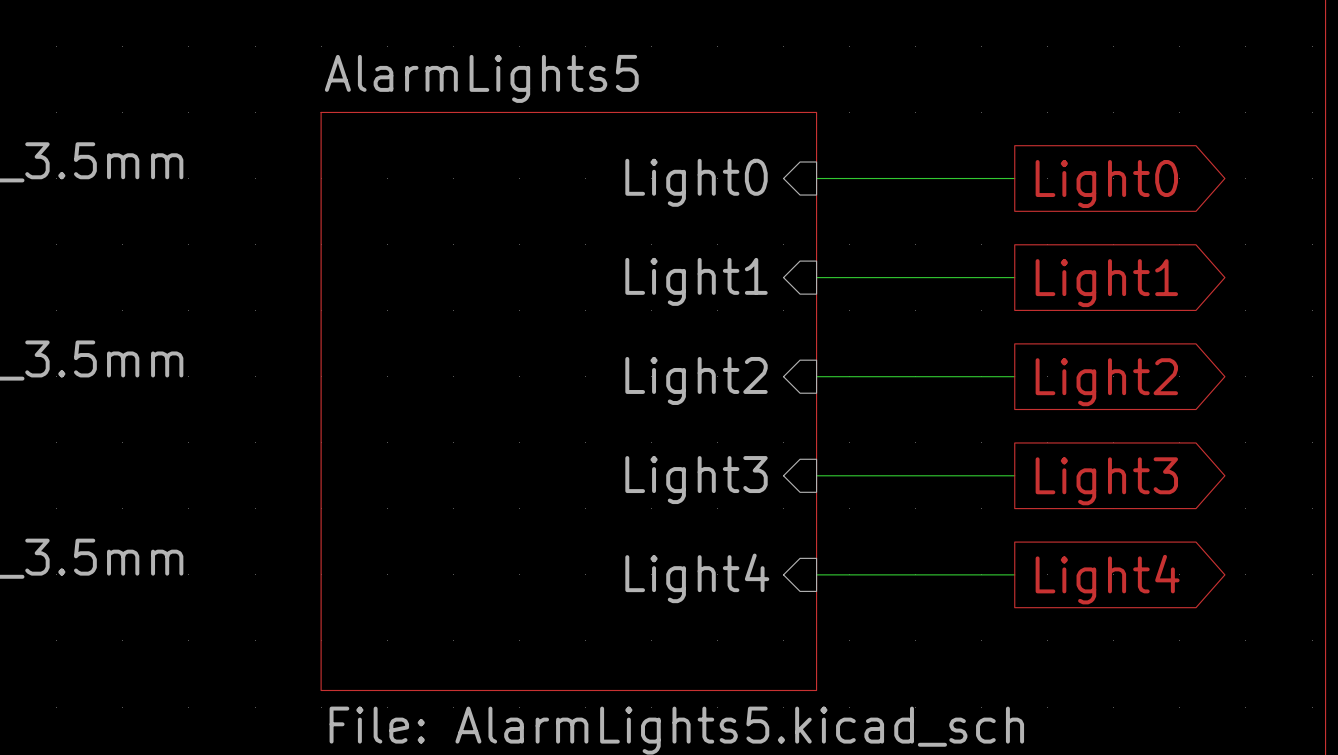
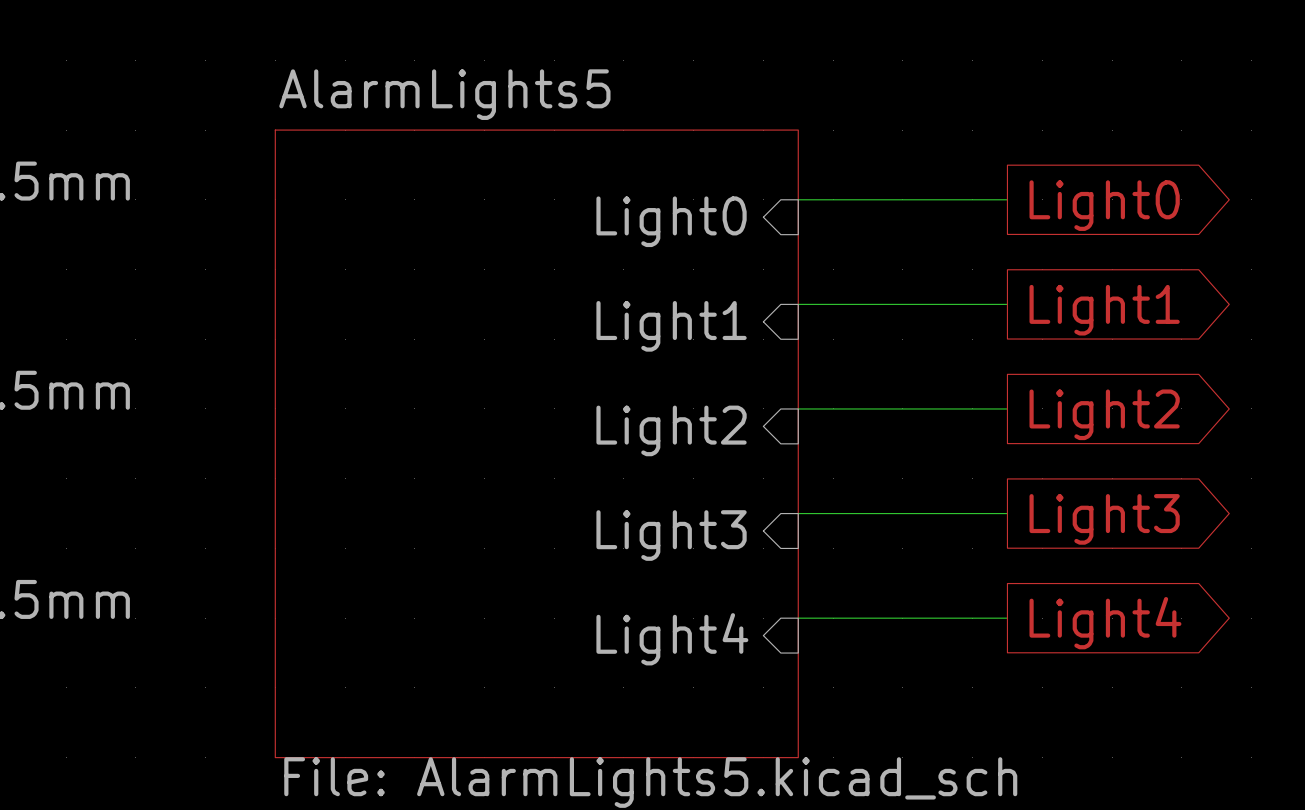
sheet AlarmLights5 shape: [321, 112, 817, 691] -> [275, 130, 799, 758]
sheet pin position: Light0 (696, 182) -> Light0 (671, 221)
sheet pin position: Light1 (696, 281) -> Light1 (671, 326)
sheet pin position: Light2 (696, 380) -> Light2 (671, 430)
sheet pin position: Light3 (696, 480) -> Light3 (671, 535)
sheet pin position: Light4 (697, 578) -> Light4 (672, 639)

